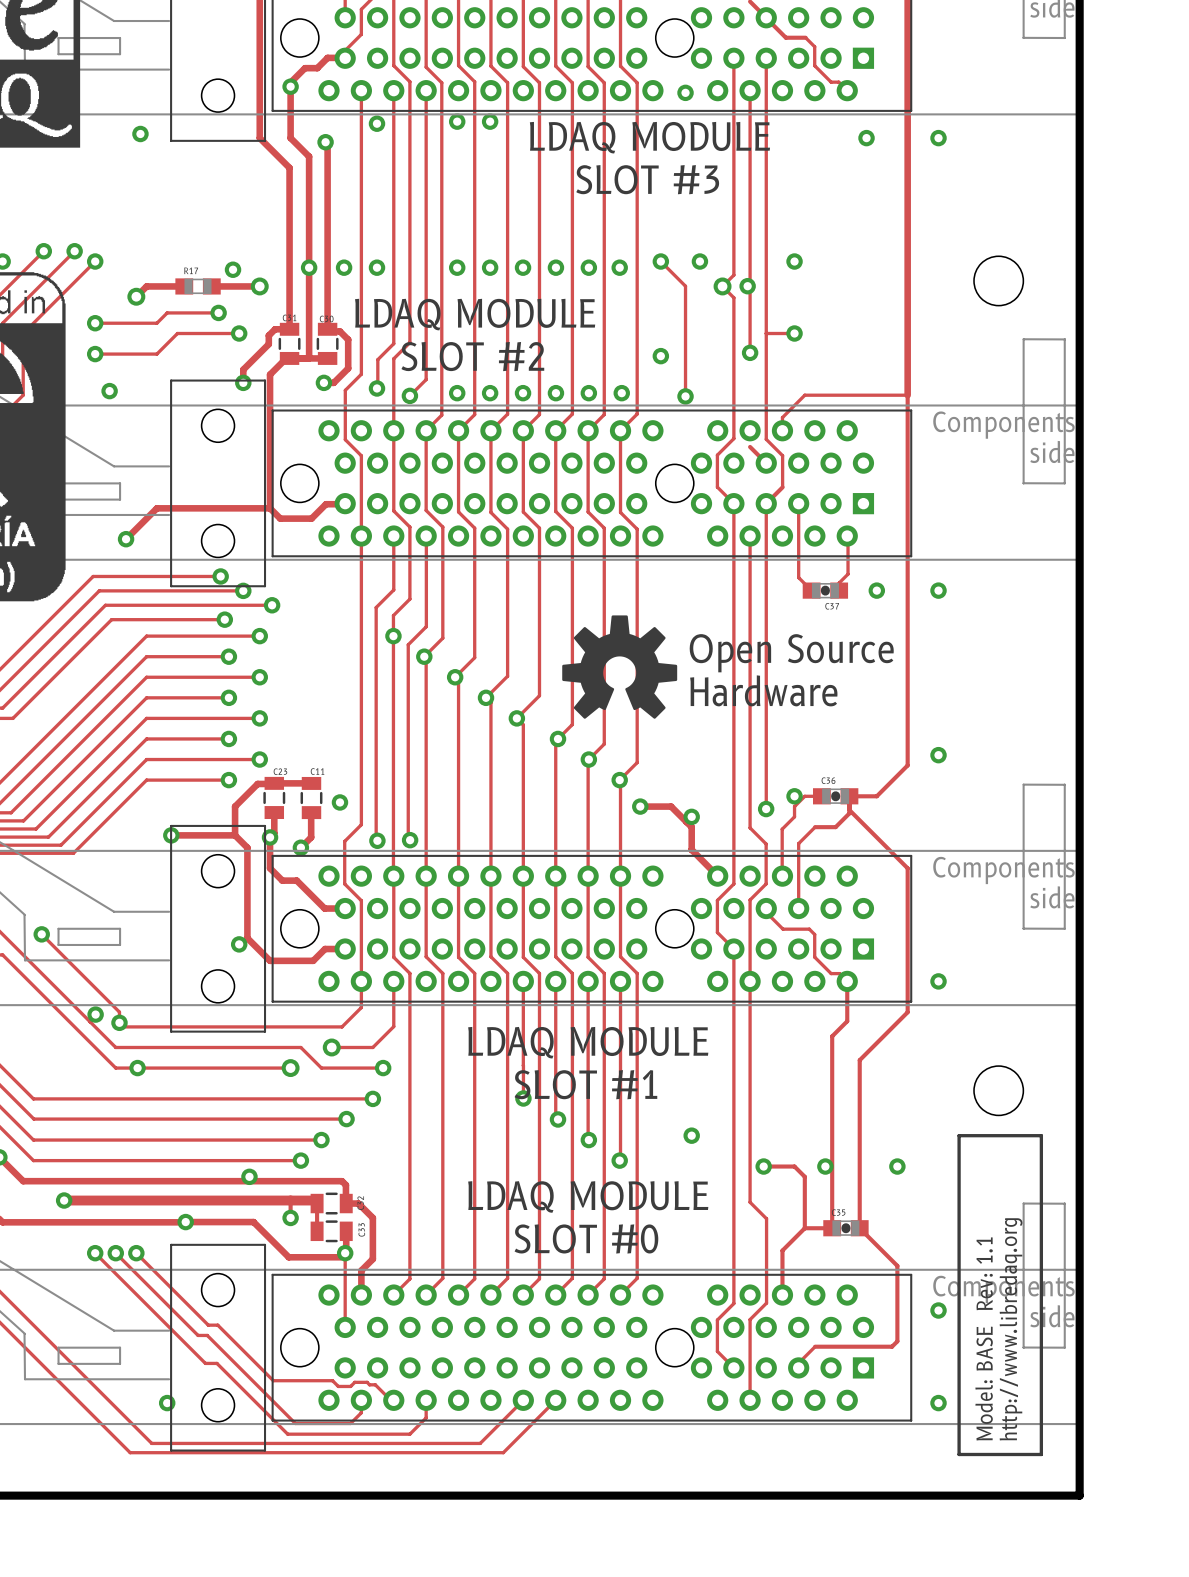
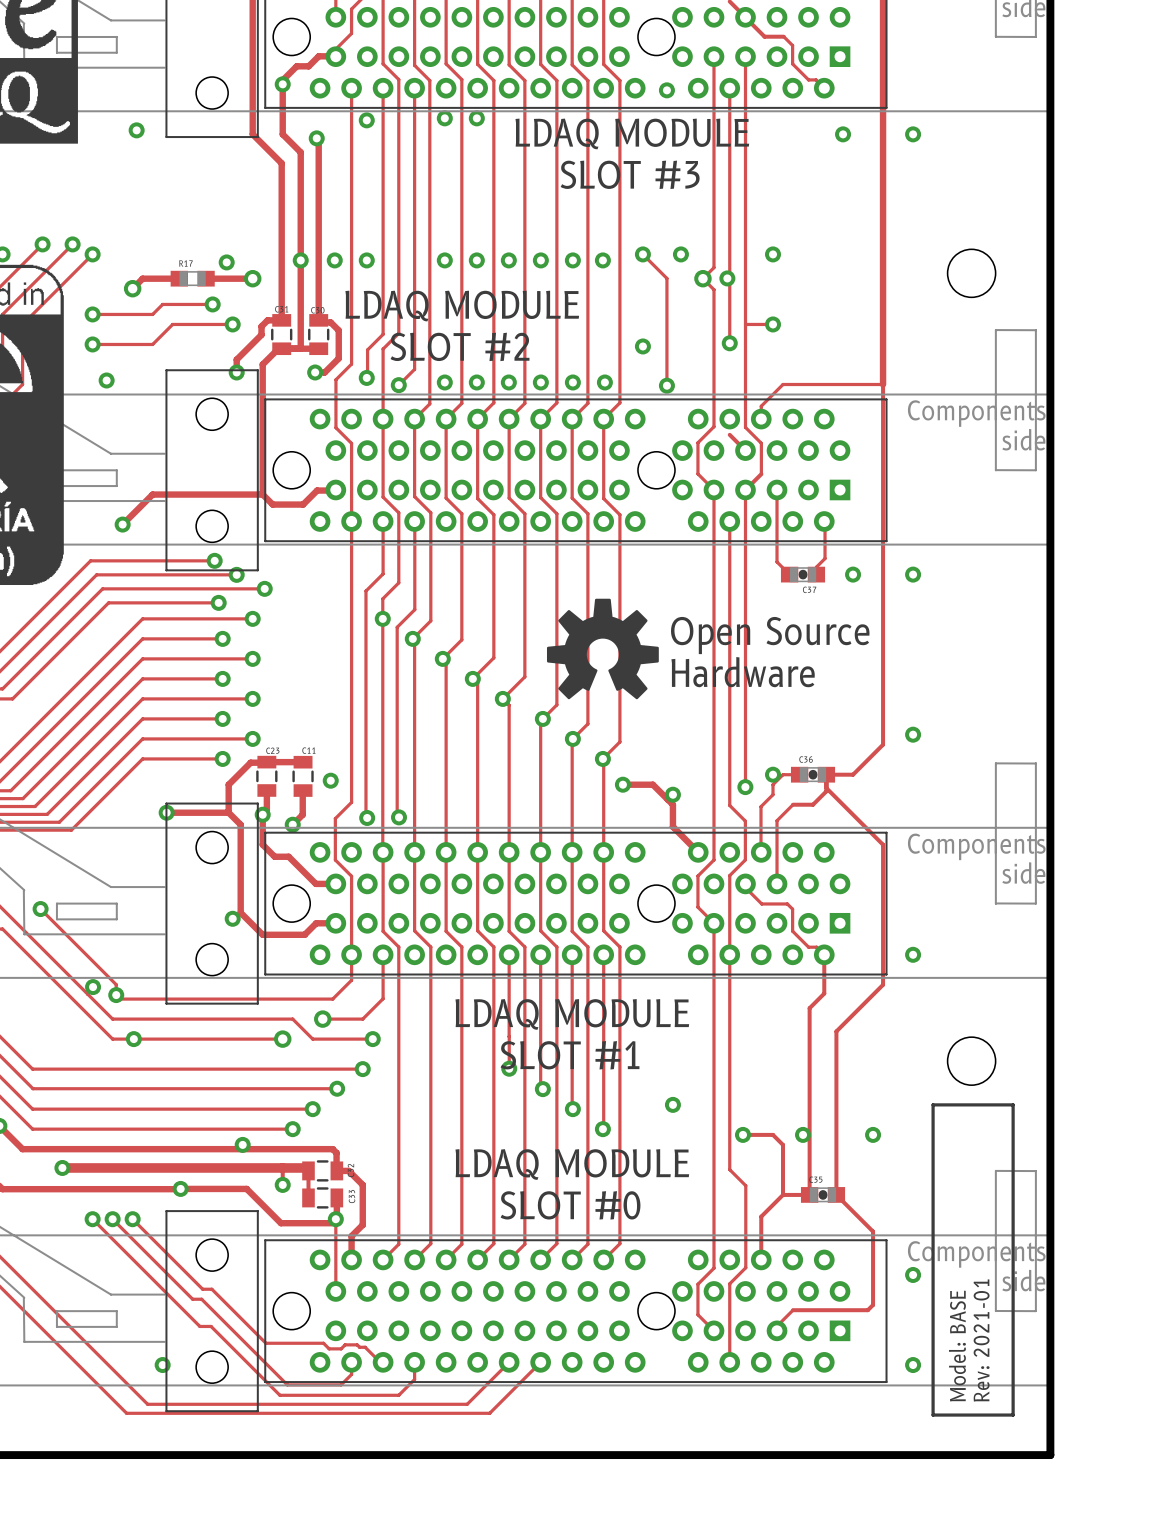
text: http://www.libredaq.org (1011, 1329) -> Rev: 2021-01 (981, 1340)
text: Model: BASE Rev: 1.1 (984, 1338) -> Model: BASE (957, 1346)

